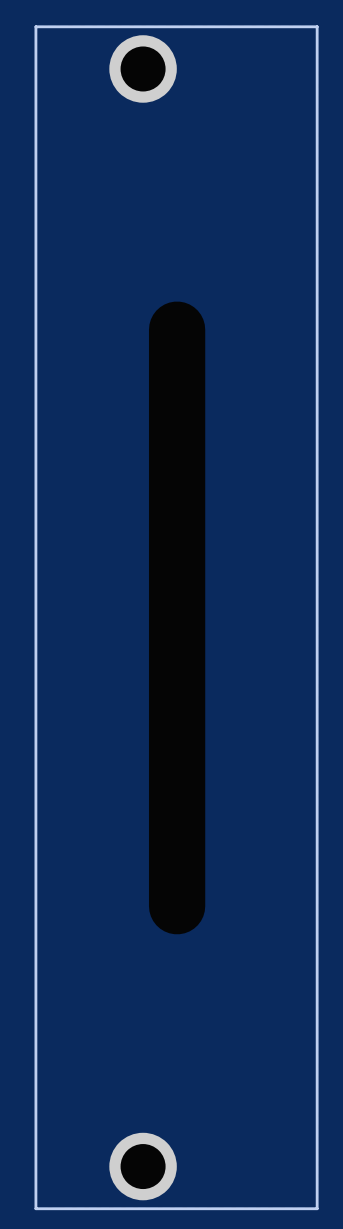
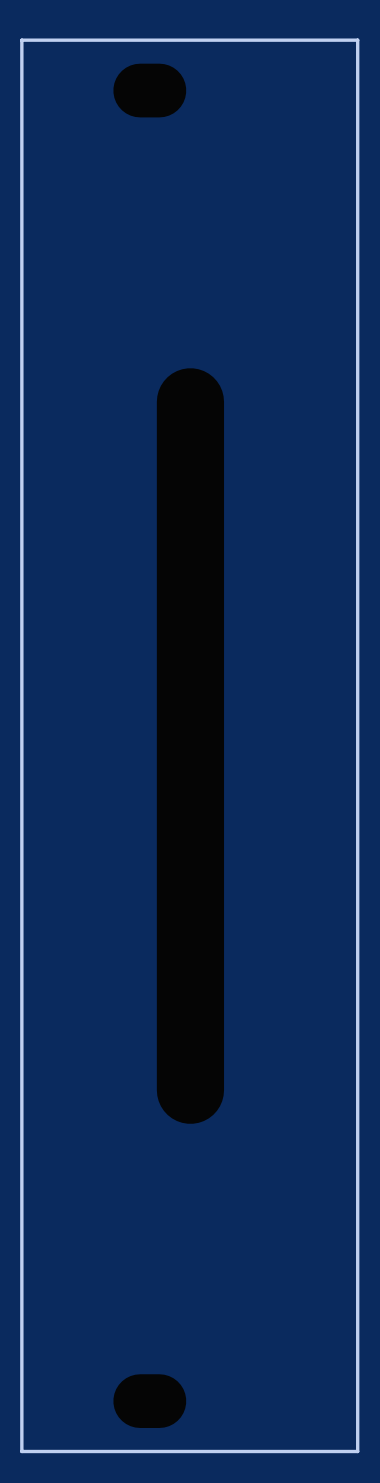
part footprint: [109, 35, 177, 103] -> [113, 63, 187, 118]
part footprint: [109, 1132, 177, 1201] -> [113, 1374, 187, 1428]

